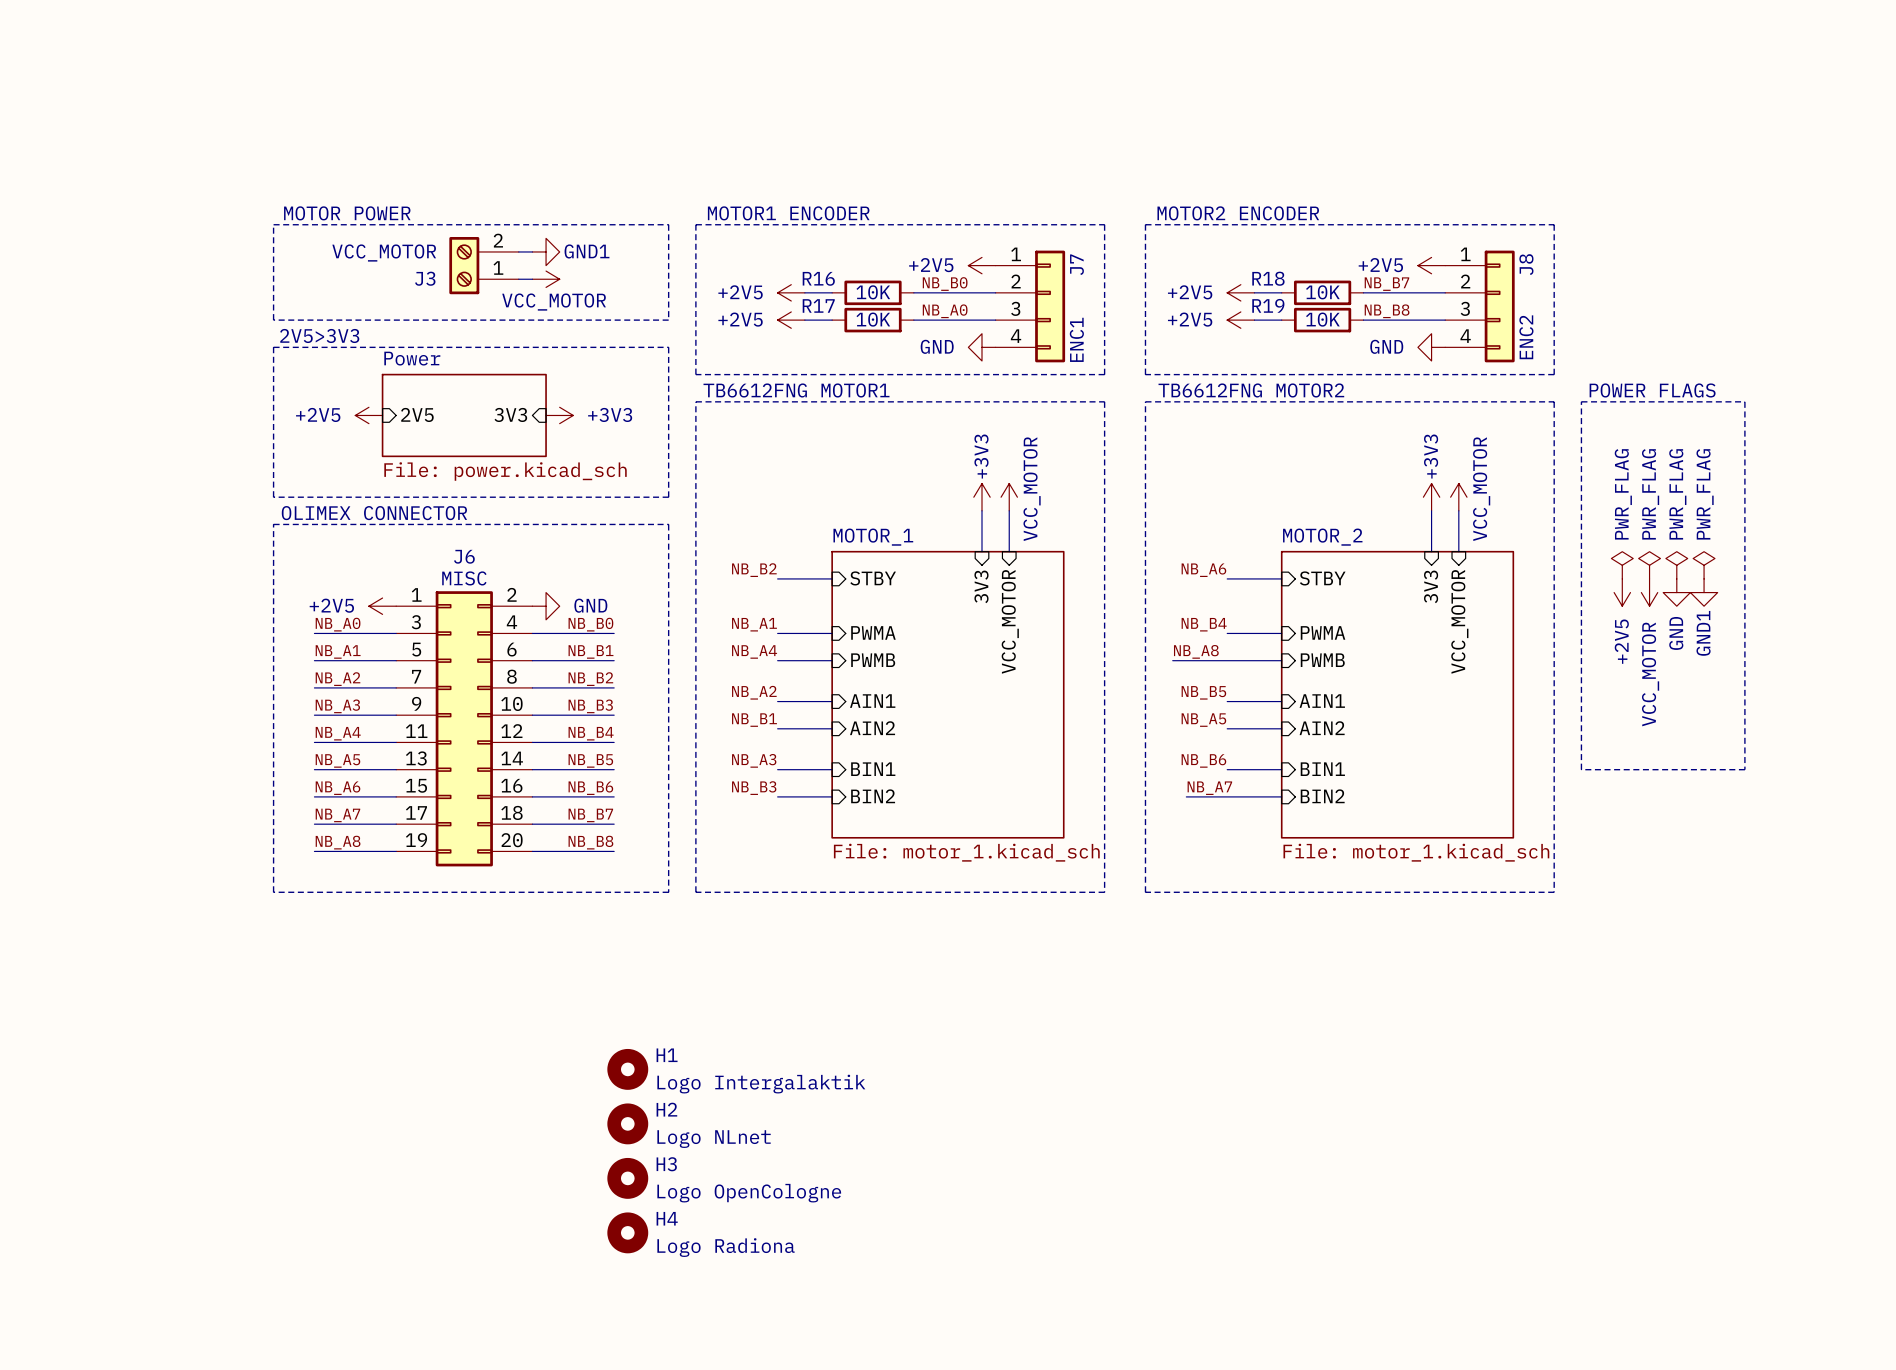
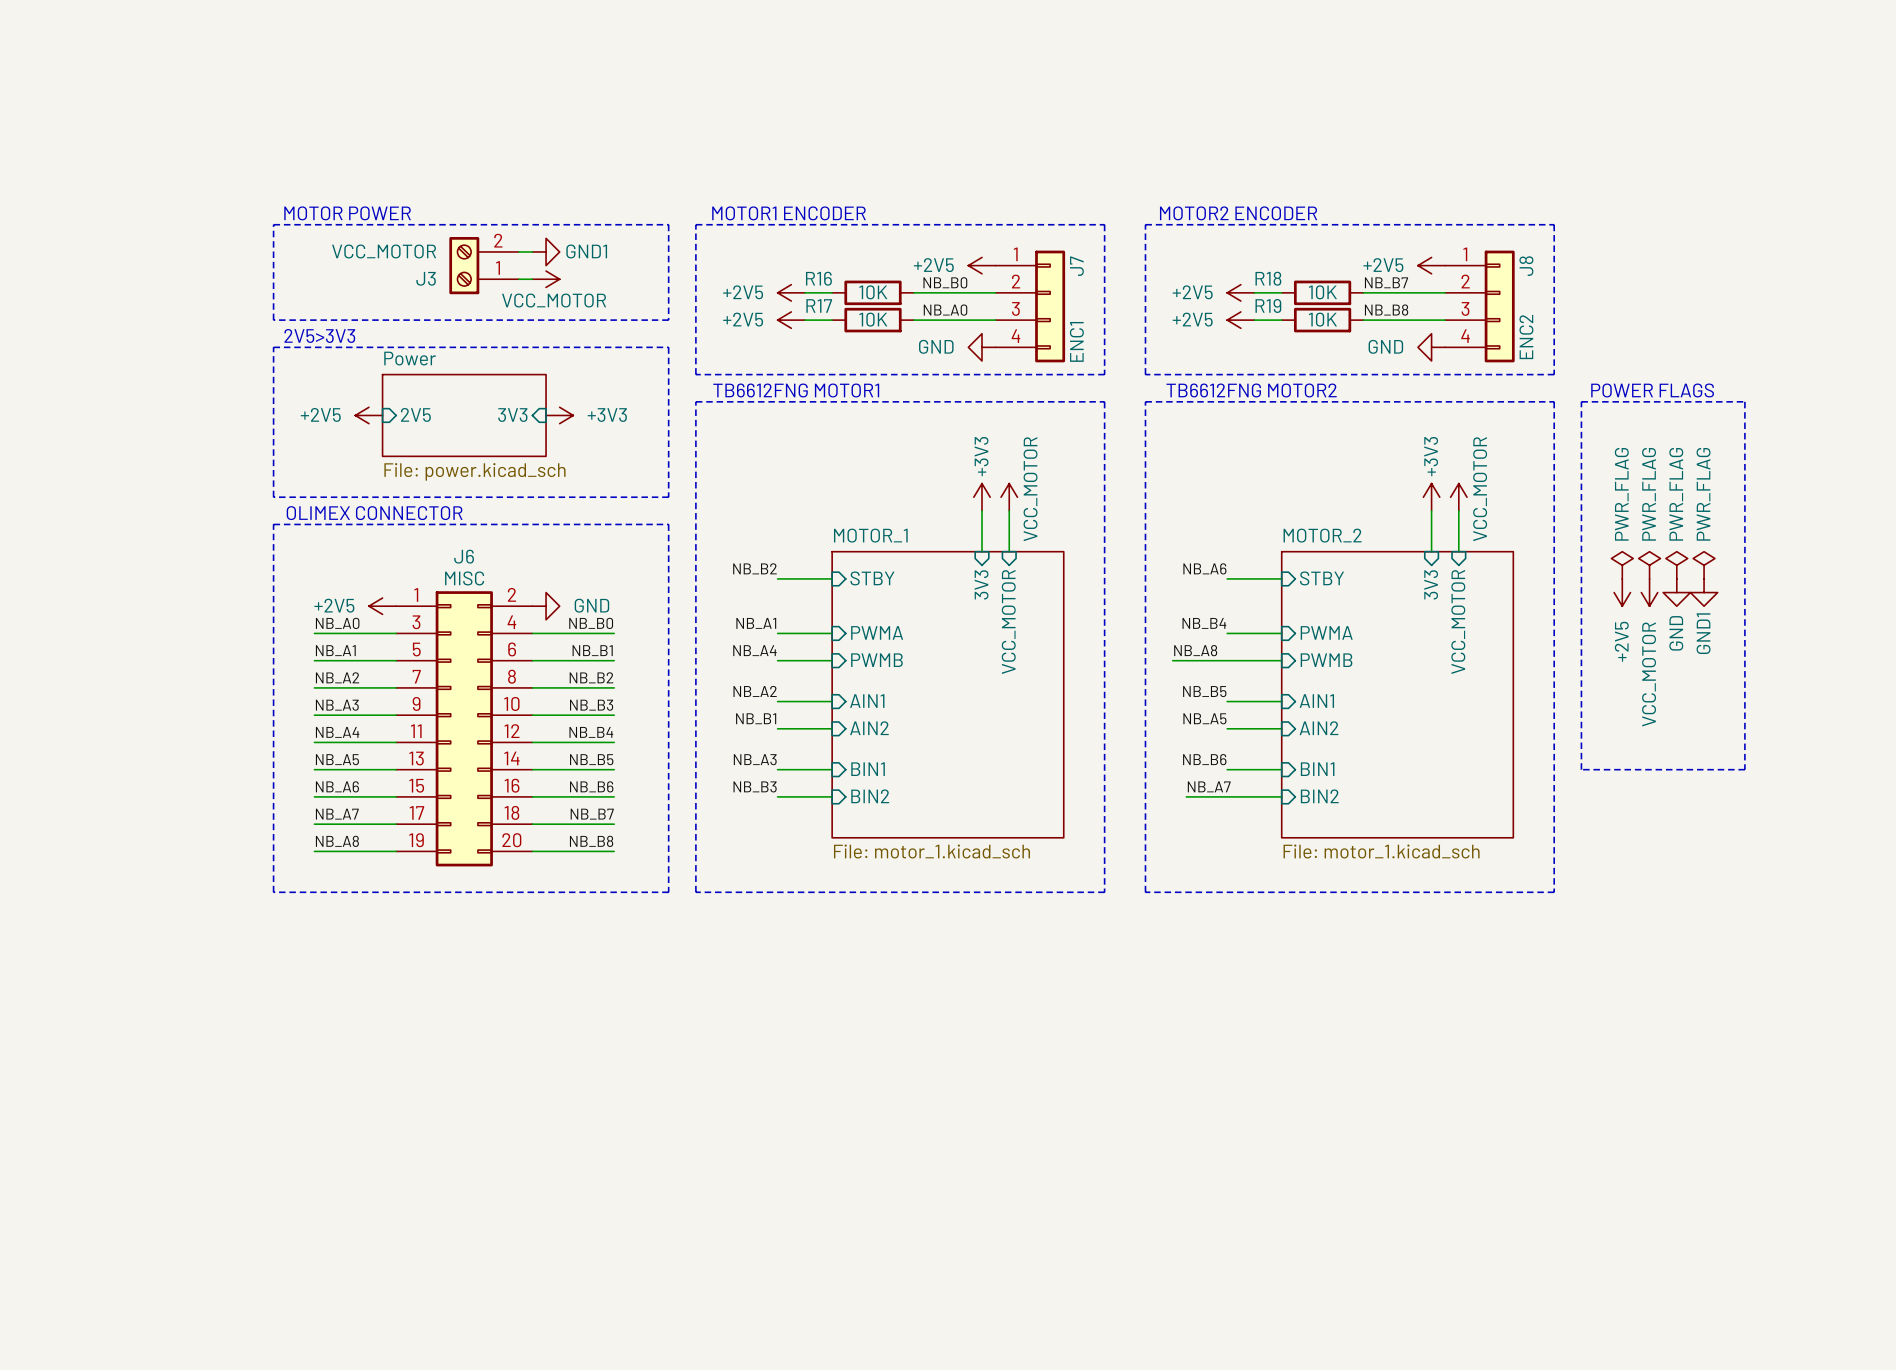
H1: Logo Intergalaktik (627, 1069) -> none
H2: Logo NLnet (627, 1123) -> none
H3: Logo OpenCologne (627, 1178) -> none
H4: Logo Radiona (627, 1232) -> none

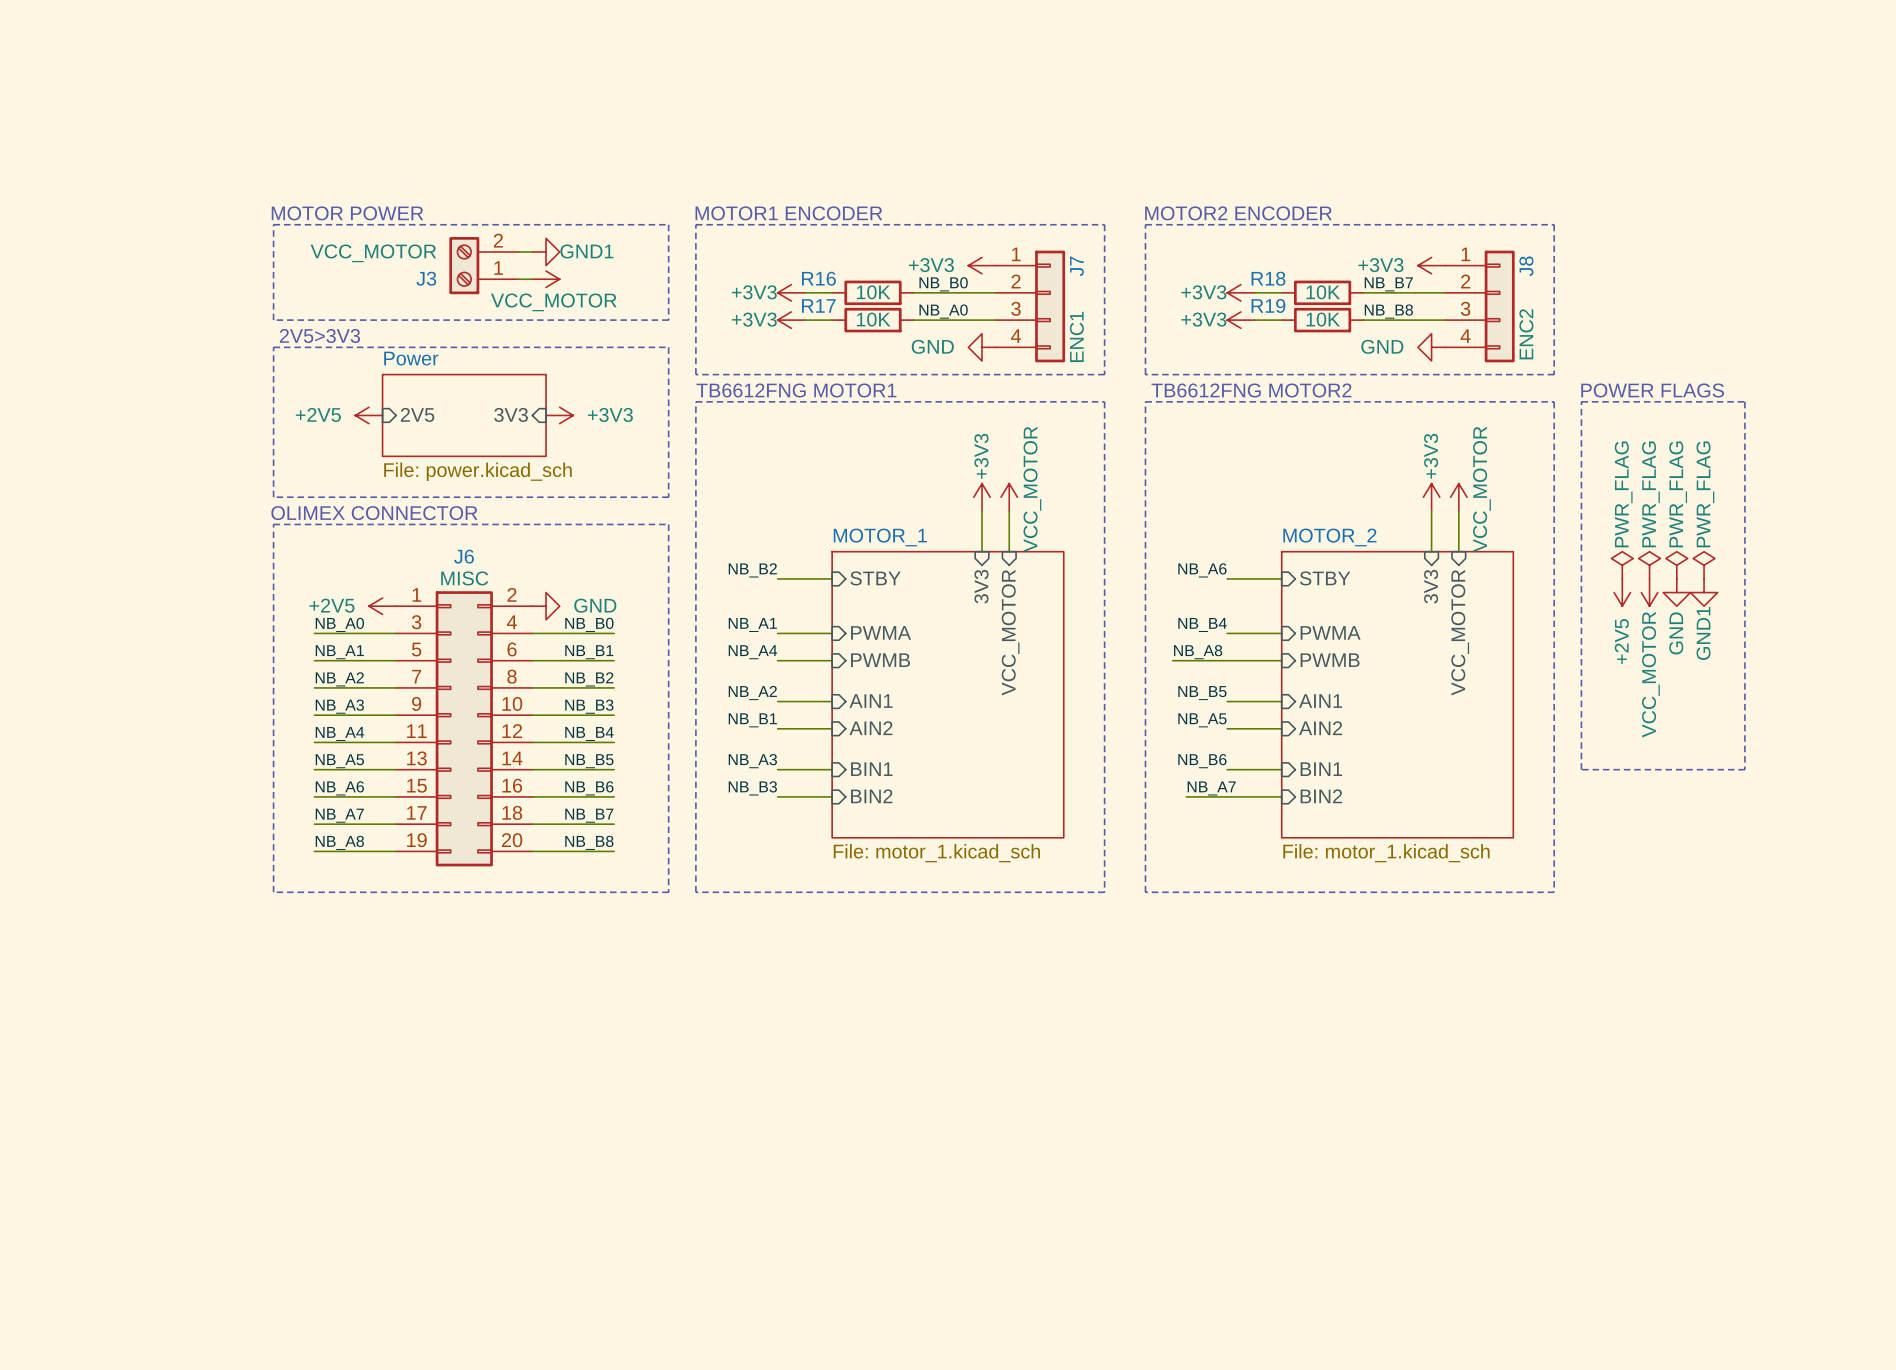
power symbol: +2V5 (982, 265) -> +3V3 (982, 265)
power symbol: +2V5 (1431, 265) -> +3V3 (1431, 265)
power symbol: +2V5 (791, 292) -> +3V3 (791, 292)
power symbol: +2V5 (1240, 292) -> +3V3 (1240, 292)
power symbol: +2V5 (791, 320) -> +3V3 (791, 320)
power symbol: +2V5 (1240, 320) -> +3V3 (1240, 320)

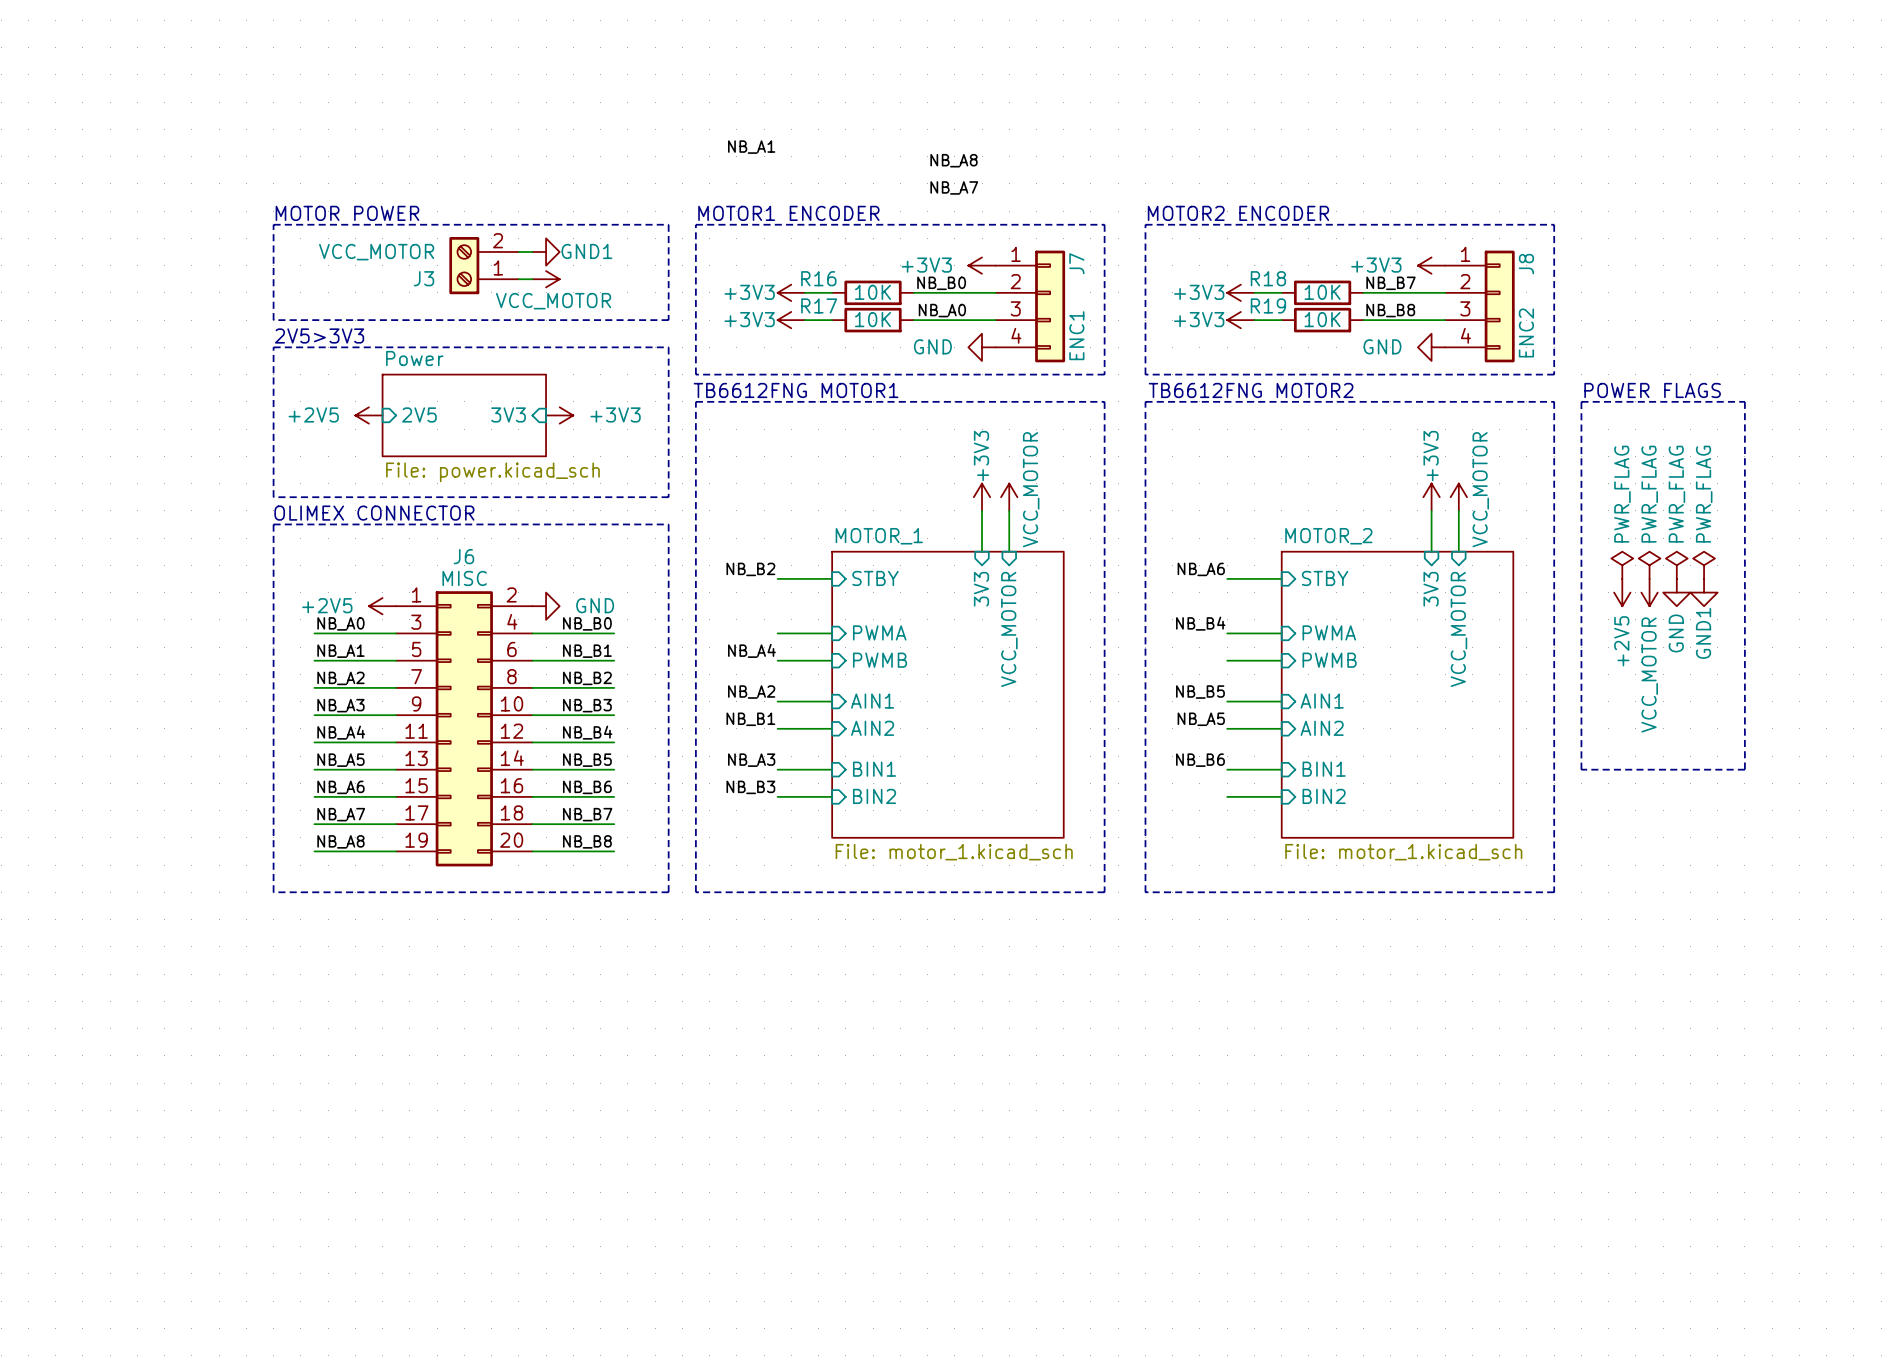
label: none -> NB_A1 (751, 147)
label: none -> NB_A8 (954, 160)
label: none -> NB_A7 (954, 187)
label: NB_A1 (752, 624) -> none
label: NB_A8 (1198, 652) -> none
wire: (1172, 660) (1227, 660) -> none
label: NB_A7 (1211, 788) -> none
wire: (1186, 796) (1227, 796) -> none

